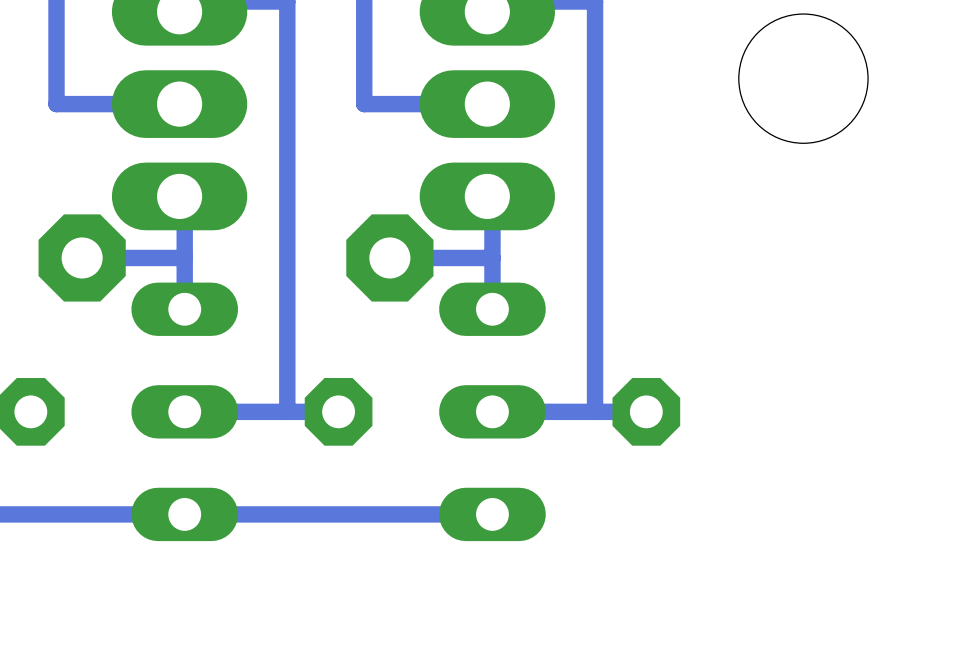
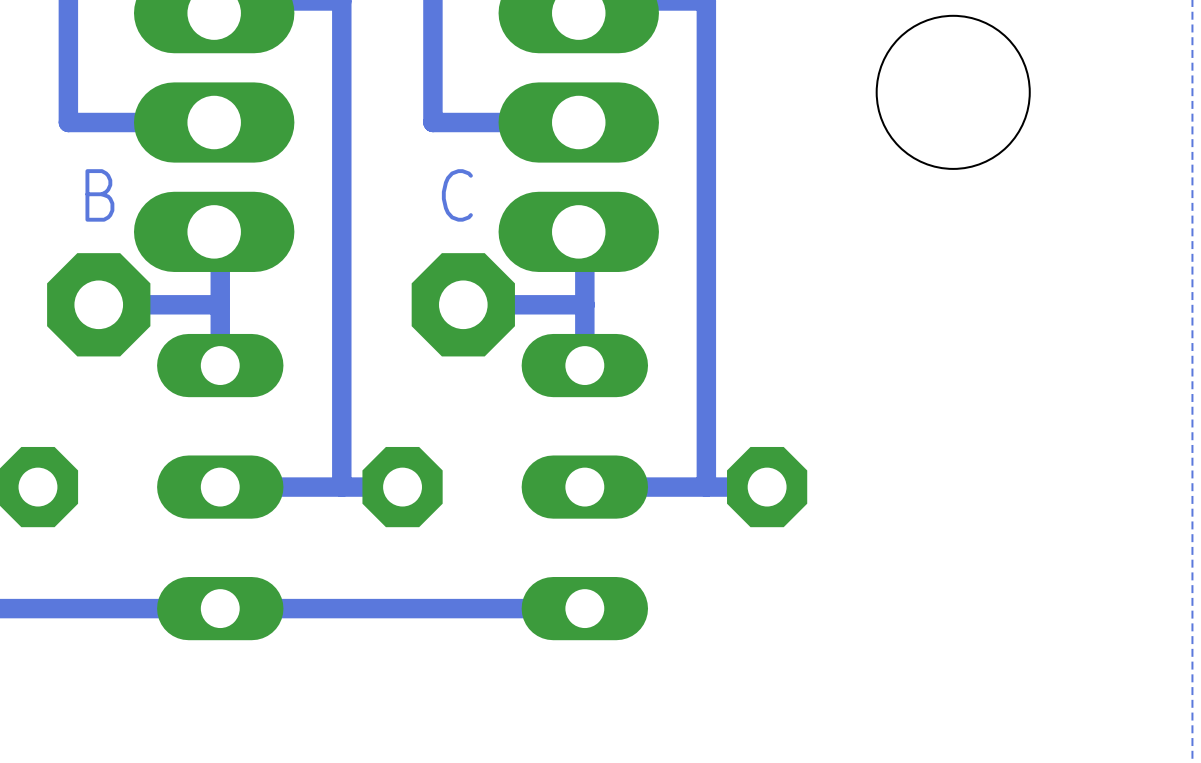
text: none -> B (99, 195)
text: none -> C (457, 195)

